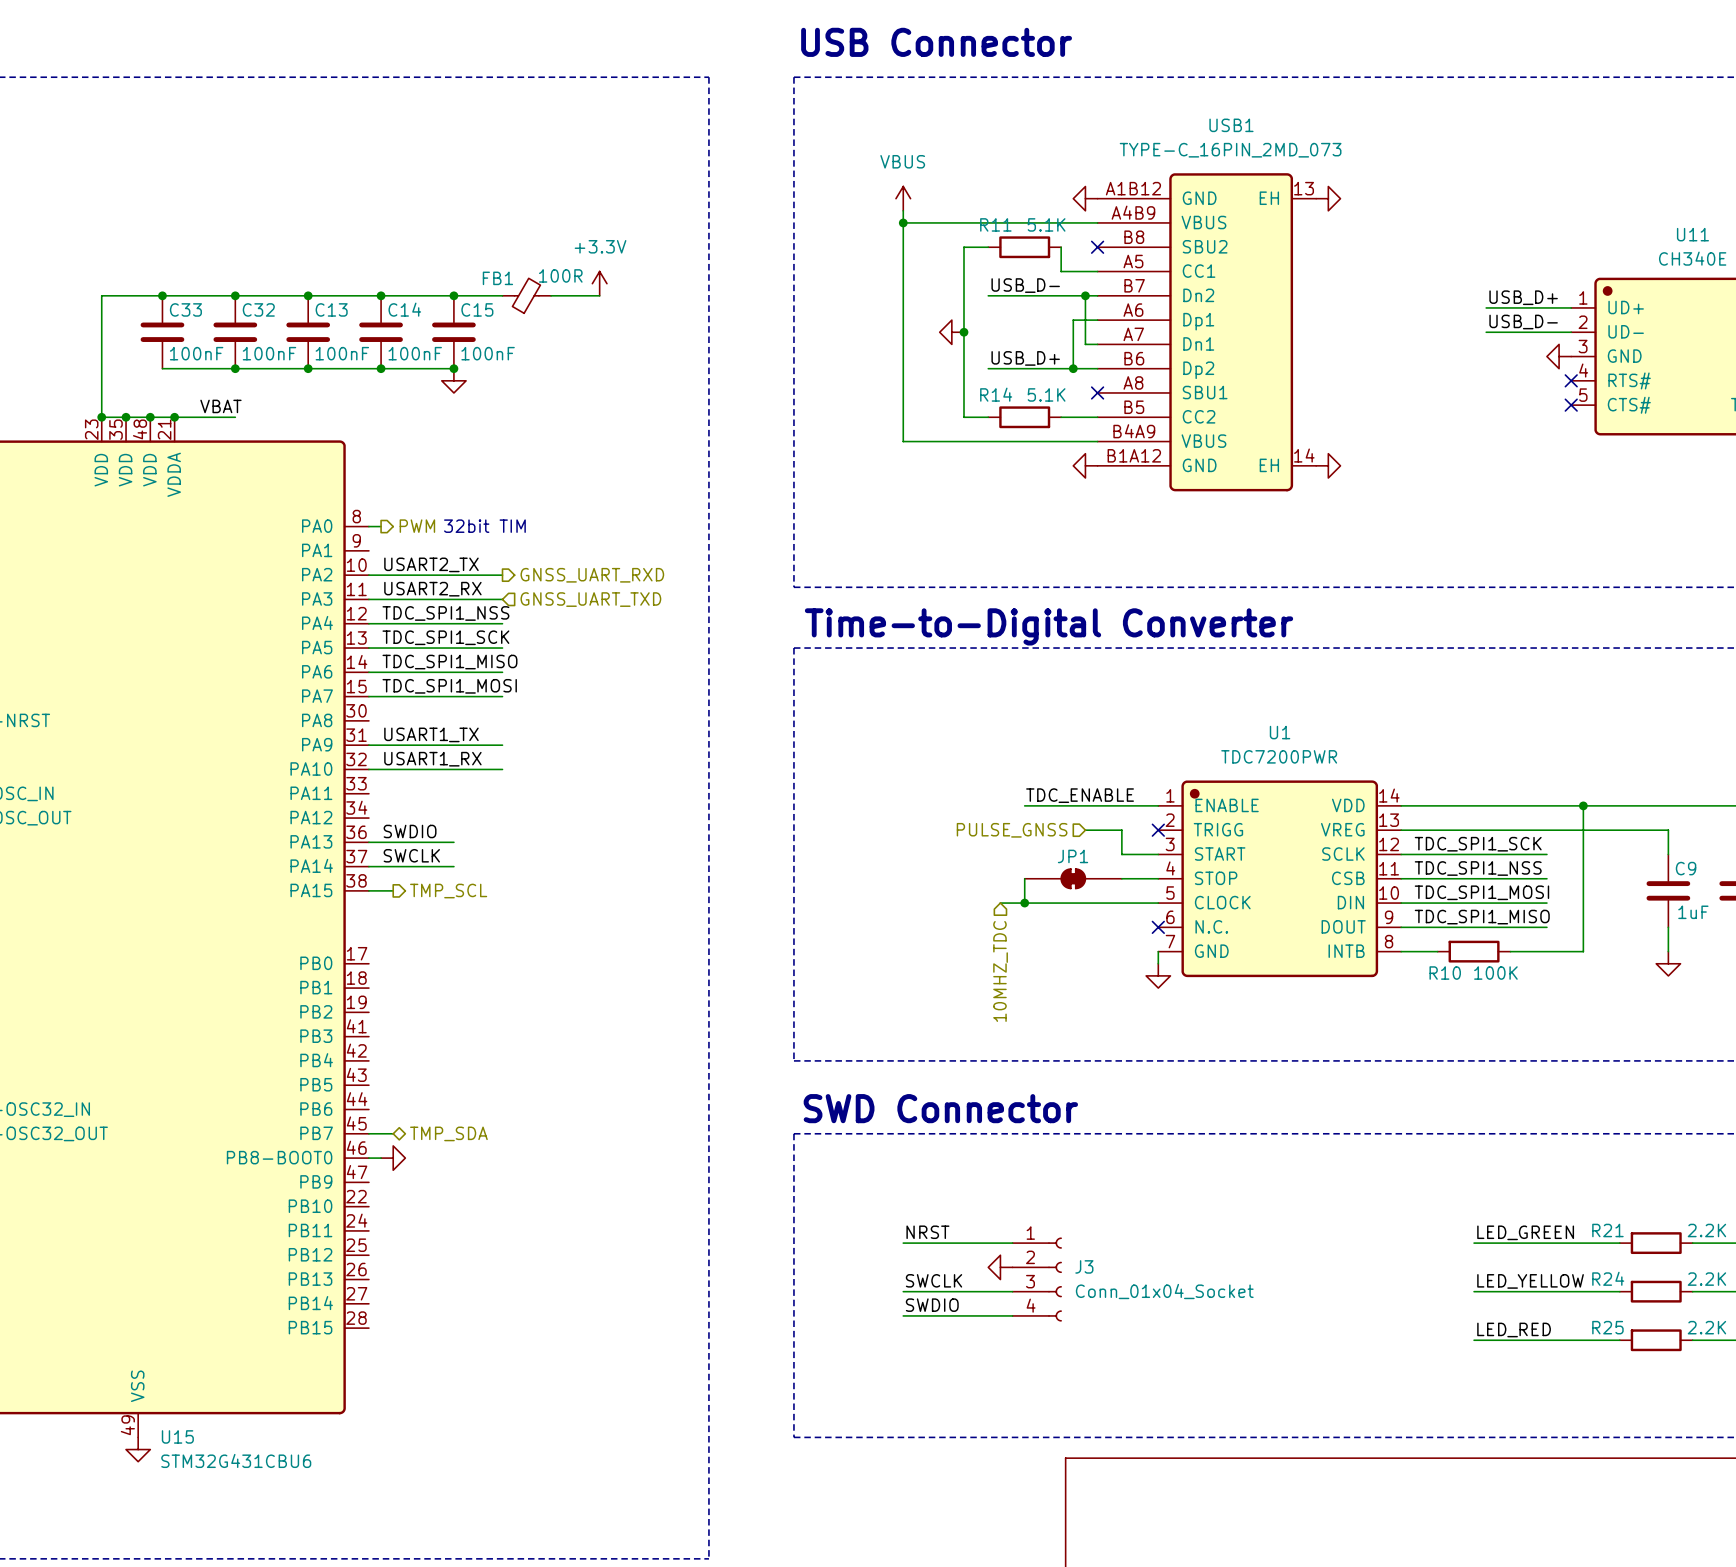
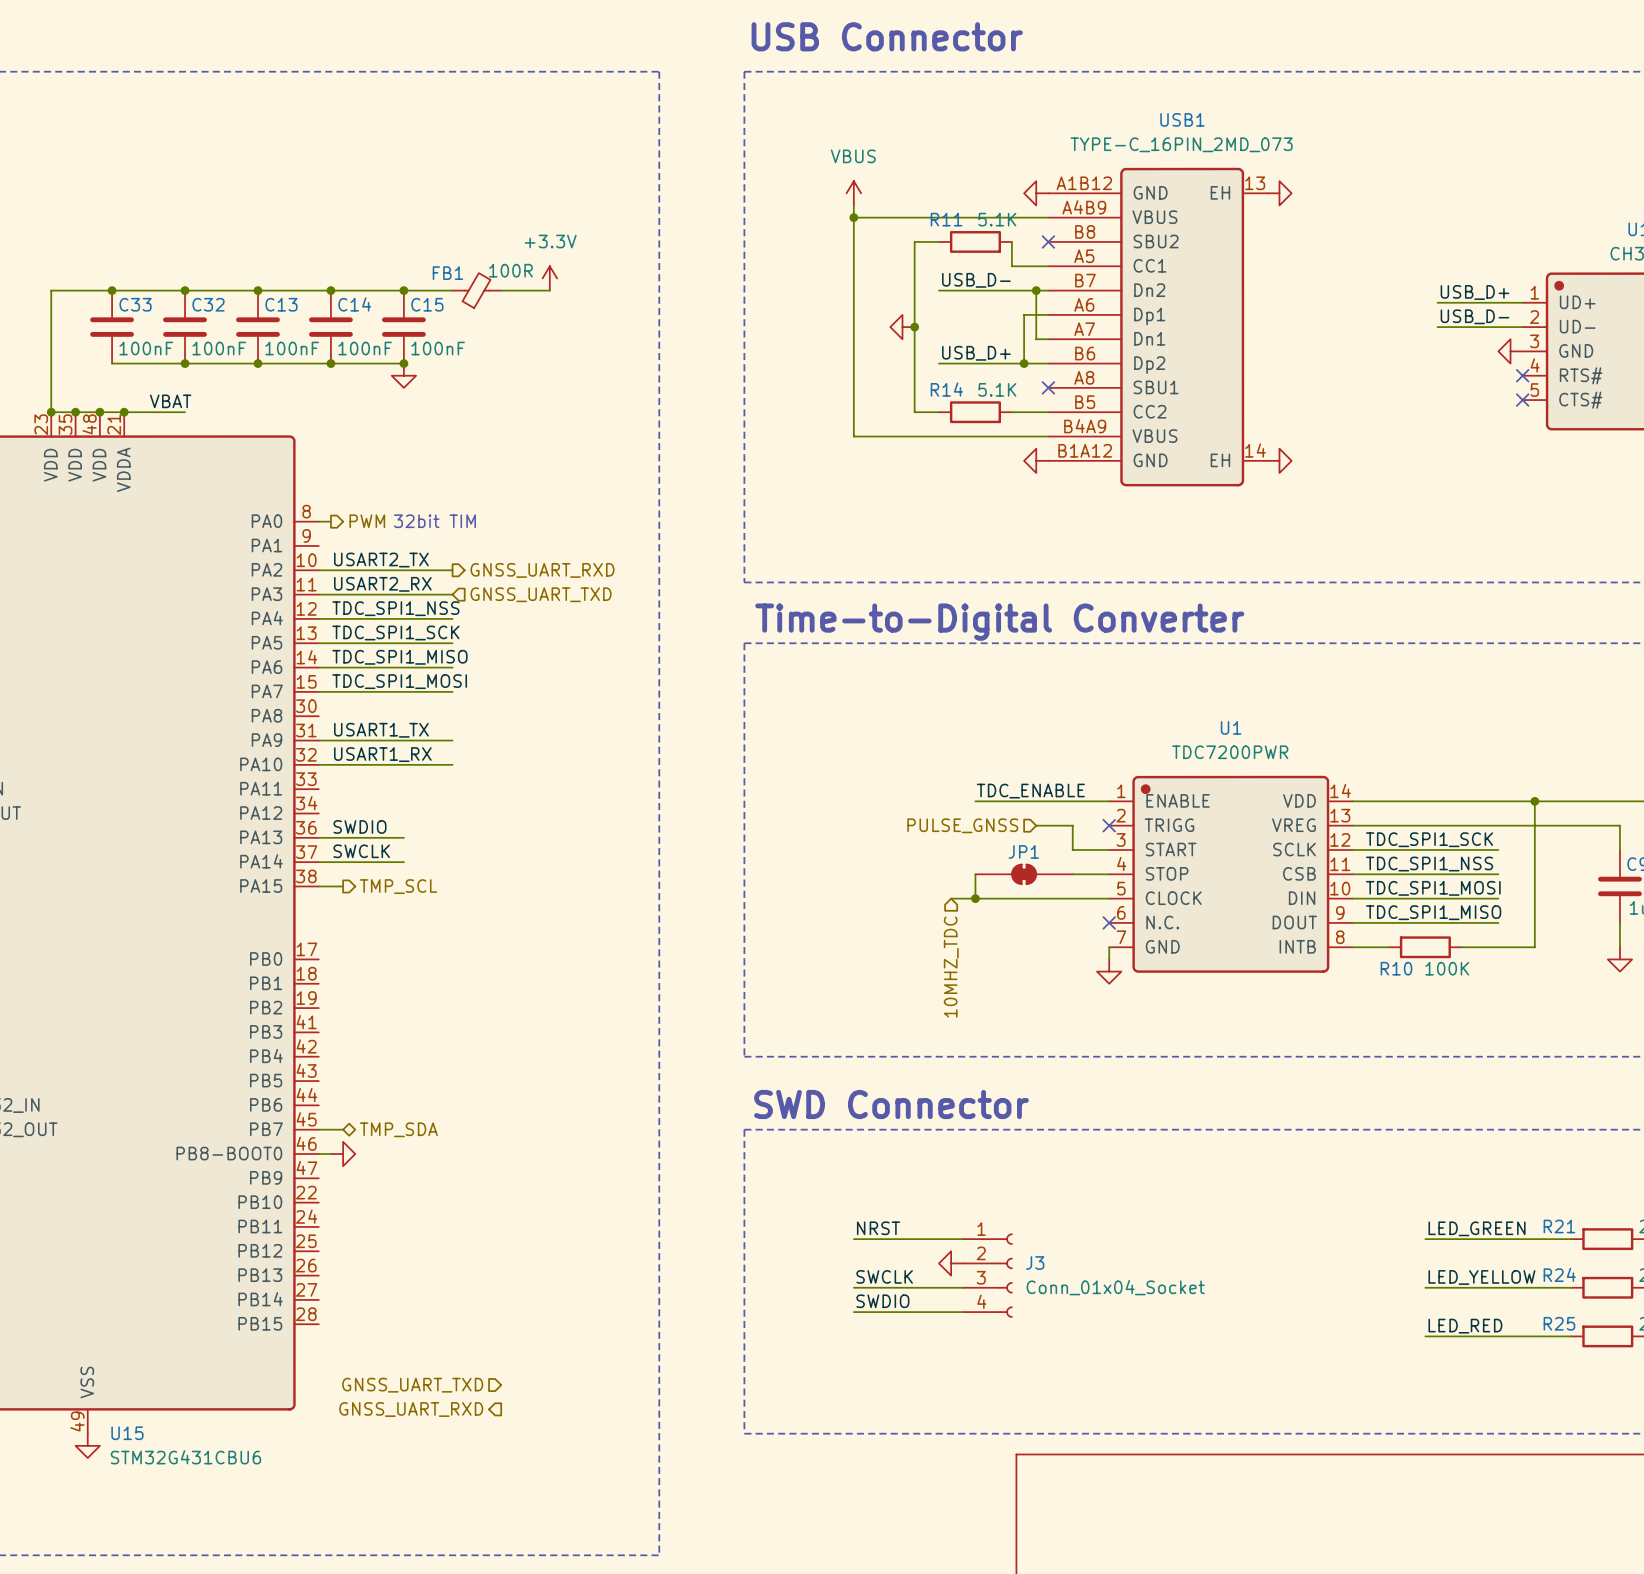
hierarchical label: none -> GNSS_UART_TXD (412, 1385)
hierarchical label: none -> GNSS_UART_RXD (411, 1409)

